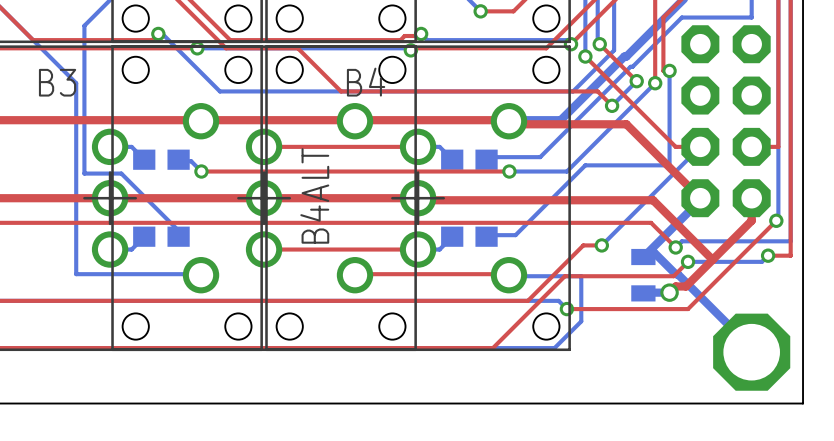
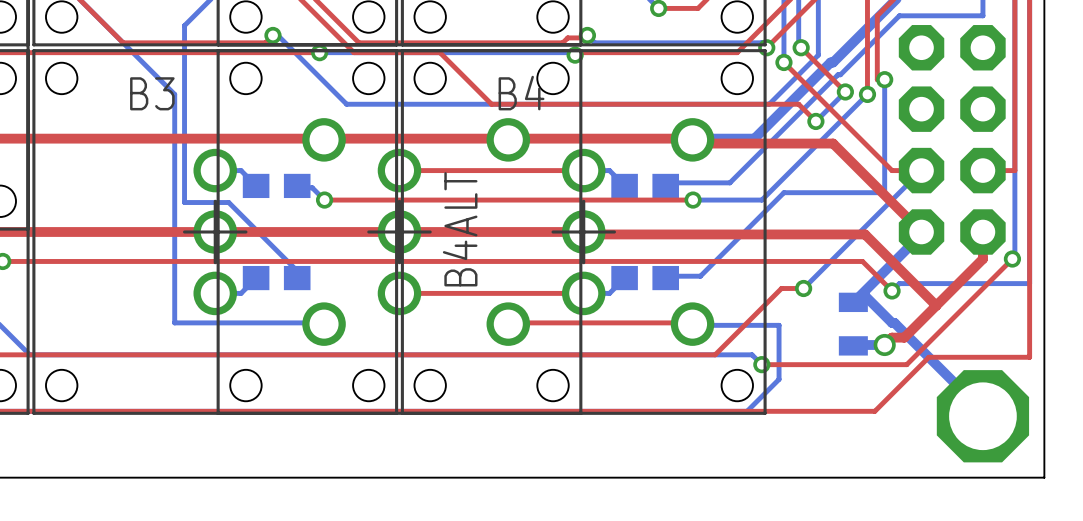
bottom track: (768, 255) (761, 261) (688, 261) -> none
top track: (768, 255) (790, 255) -> none
via: (768, 255) -> none
top track: (688, 261) (673, 276) (564, 276) (492, 348) -> (1029, 300) (1029, 357) (928, 357) (874, 411) (673, 411)
via: (688, 261) -> none

